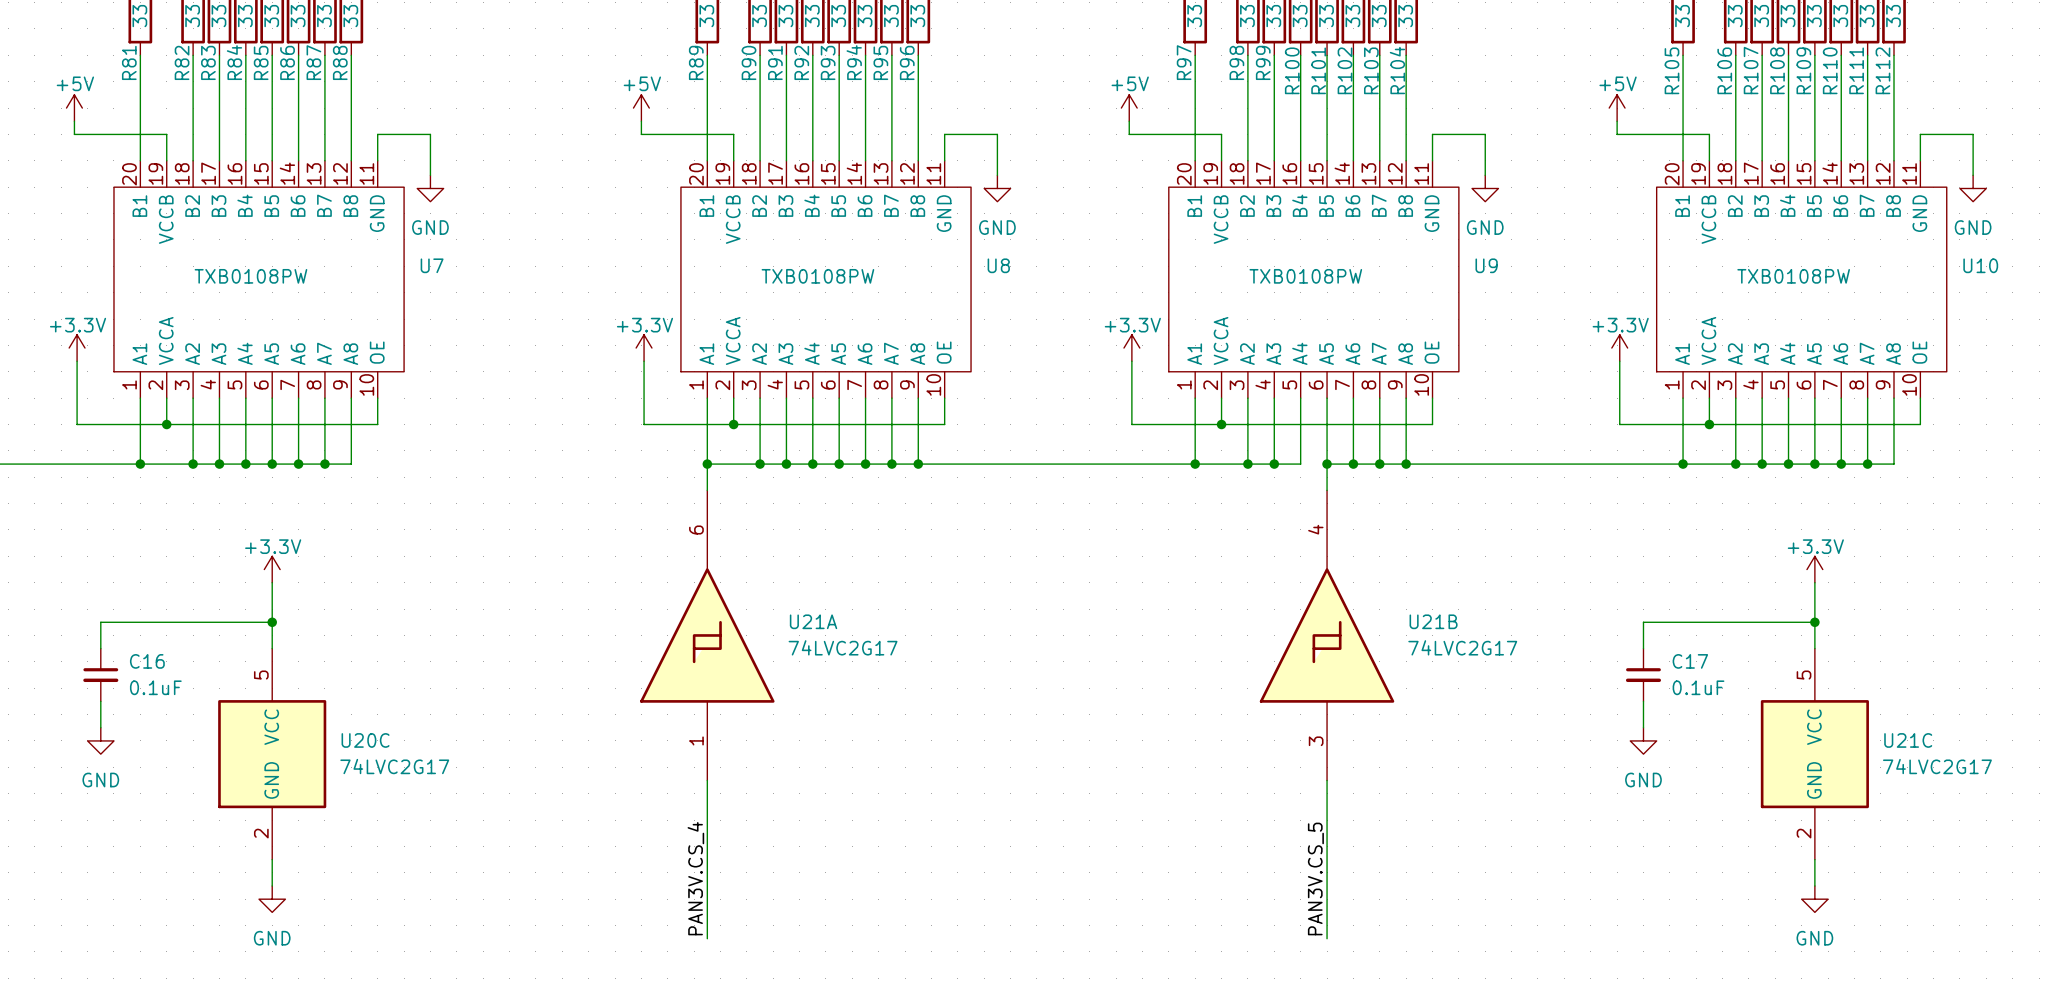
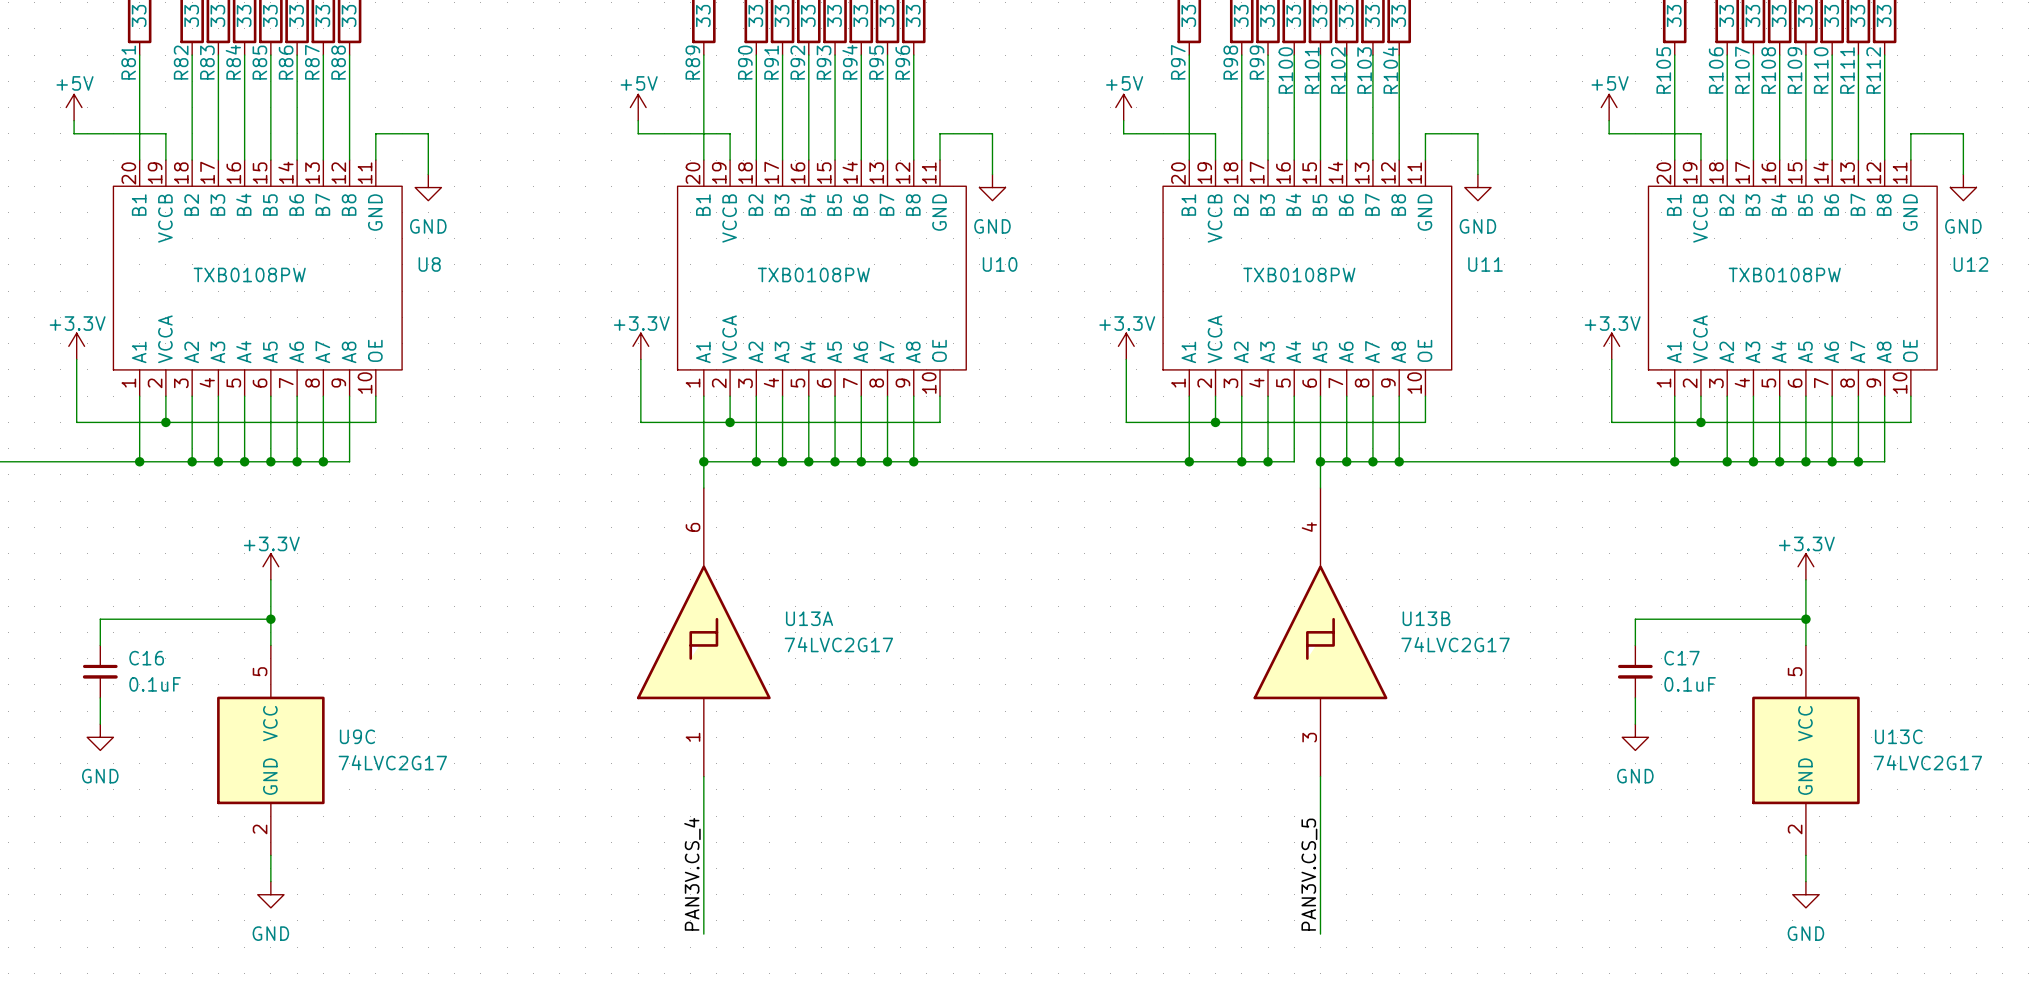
U7 name: U7 (432, 265) -> U8 (429, 264)
U8 name: U8 (998, 265) -> U10 (1000, 264)
U9 name: U9 (1486, 265) -> U11 (1485, 264)
U10 name: U10 (1980, 265) -> U12 (1970, 264)
U21A name: U21A (813, 621) -> U13A (809, 618)
U21B name: U21B (1433, 621) -> U13B (1426, 618)
U20C name: U20C (365, 740) -> U9C (357, 736)
U21C name: U21C (1908, 740) -> U13C (1898, 736)

